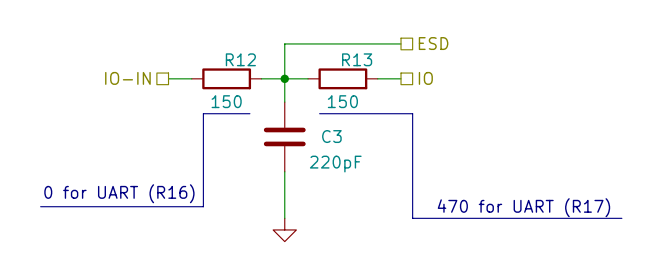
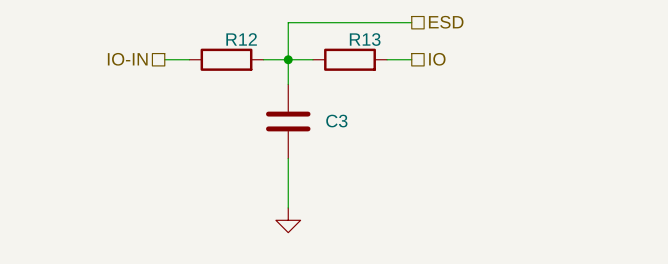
R12 value: 150 (226, 101) -> none
R13 value: 150 (342, 101) -> none
line: (249, 113) (203, 113) (203, 206) (40, 206) -> none
line: (319, 113) (412, 113) (412, 218) (621, 218) -> none
C3 value: 220pF (335, 164) -> none
text: 0 for UART (R16) (119, 193) -> none
text: 470 for UART (R17) (523, 207) -> none

